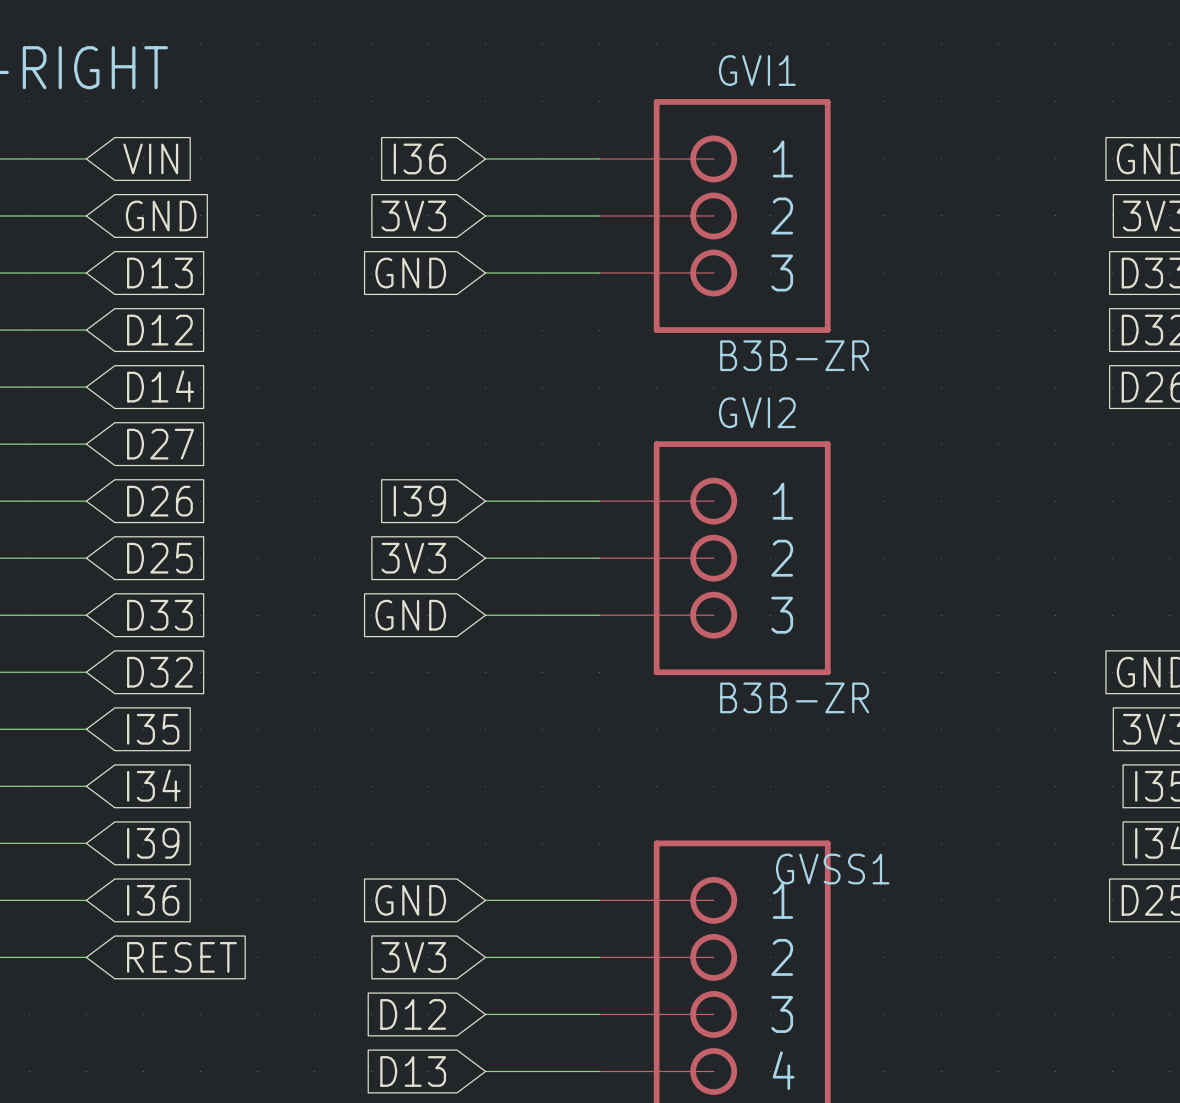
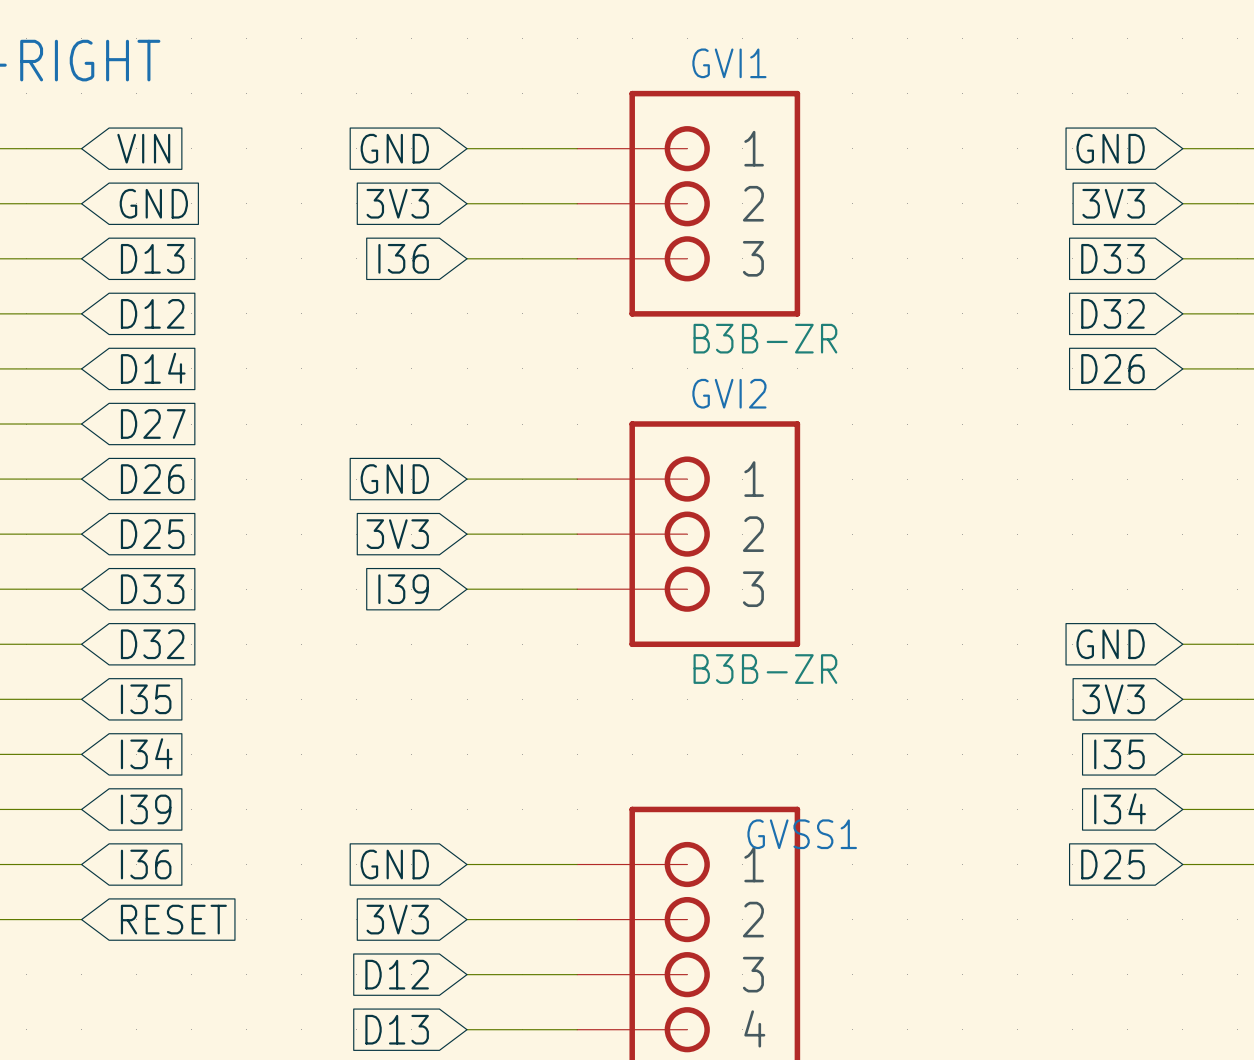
global label: I36 (419, 158) -> GND (394, 148)
global label: GND (410, 273) -> I36 (403, 258)
global label: I39 (419, 501) -> GND (394, 479)
global label: GND (410, 615) -> I39 (403, 589)

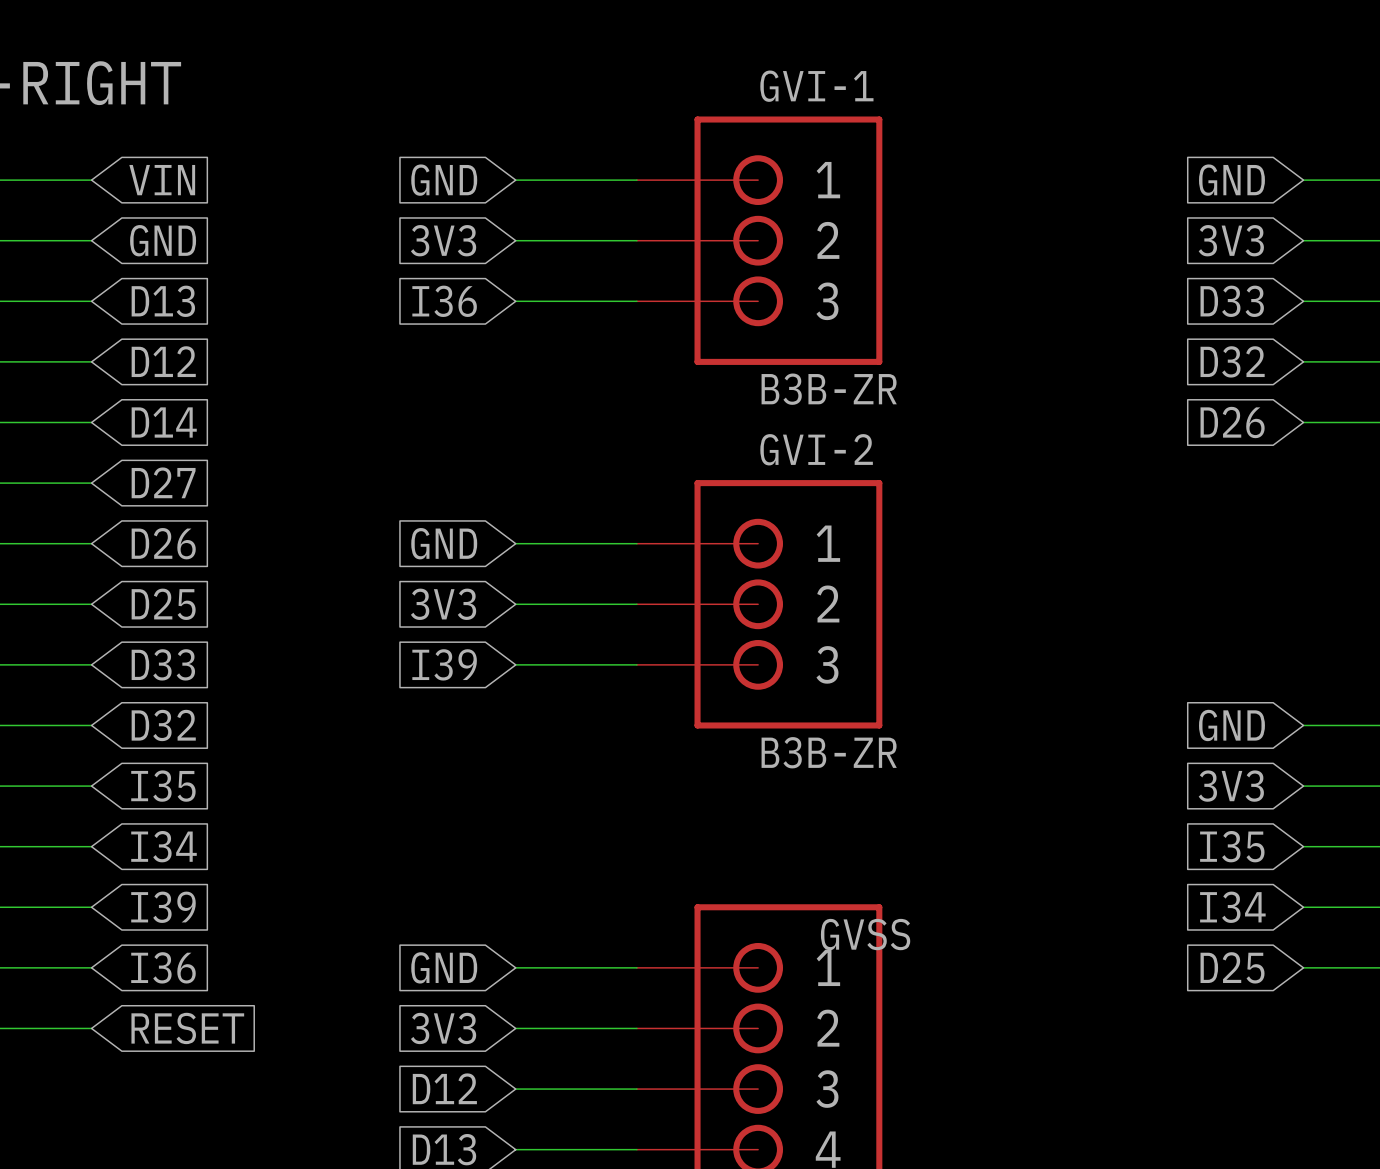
GVI1 name: GVI1 (729, 63) -> GVI-1 (816, 86)
GVI2 name: GVI2 (729, 393) -> GVI-2 (816, 449)
GVSS1 name: GVSS1 (802, 834) -> GVSS (865, 934)

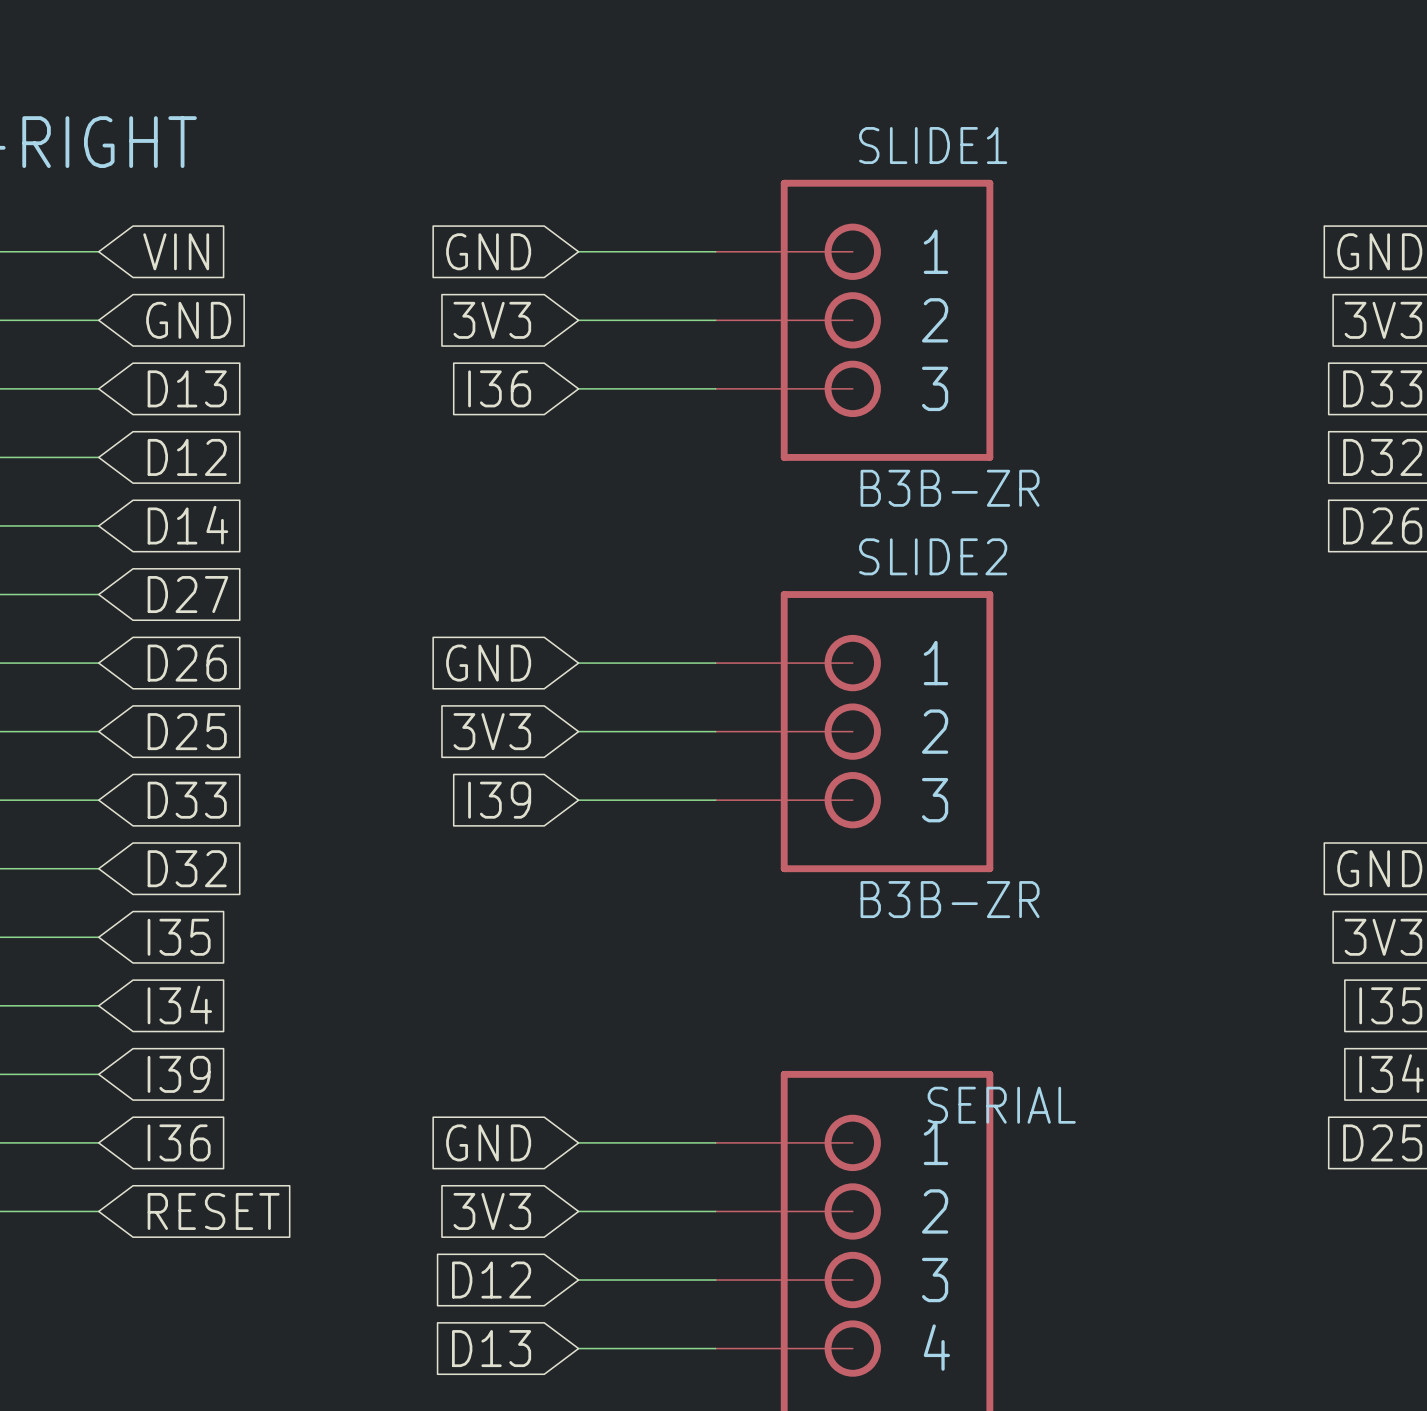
GVI-1 name: GVI-1 (816, 86) -> SLIDE1 (933, 145)
GVI-2 name: GVI-2 (816, 449) -> SLIDE2 (933, 556)
GVSS name: GVSS (865, 934) -> SERIAL (1001, 1105)

